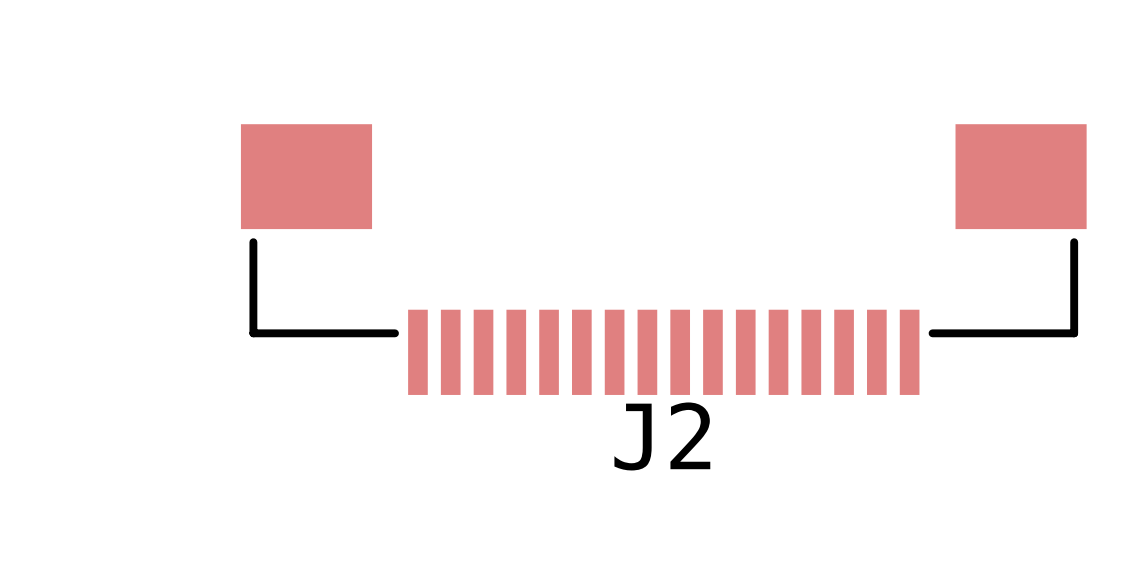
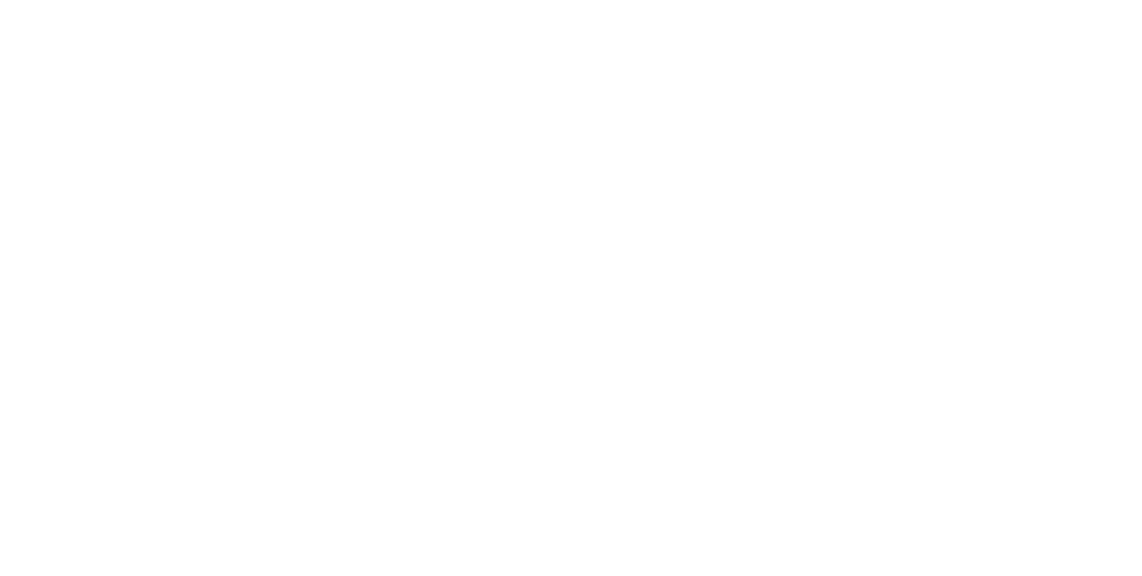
J2: (663, 259) -> none

